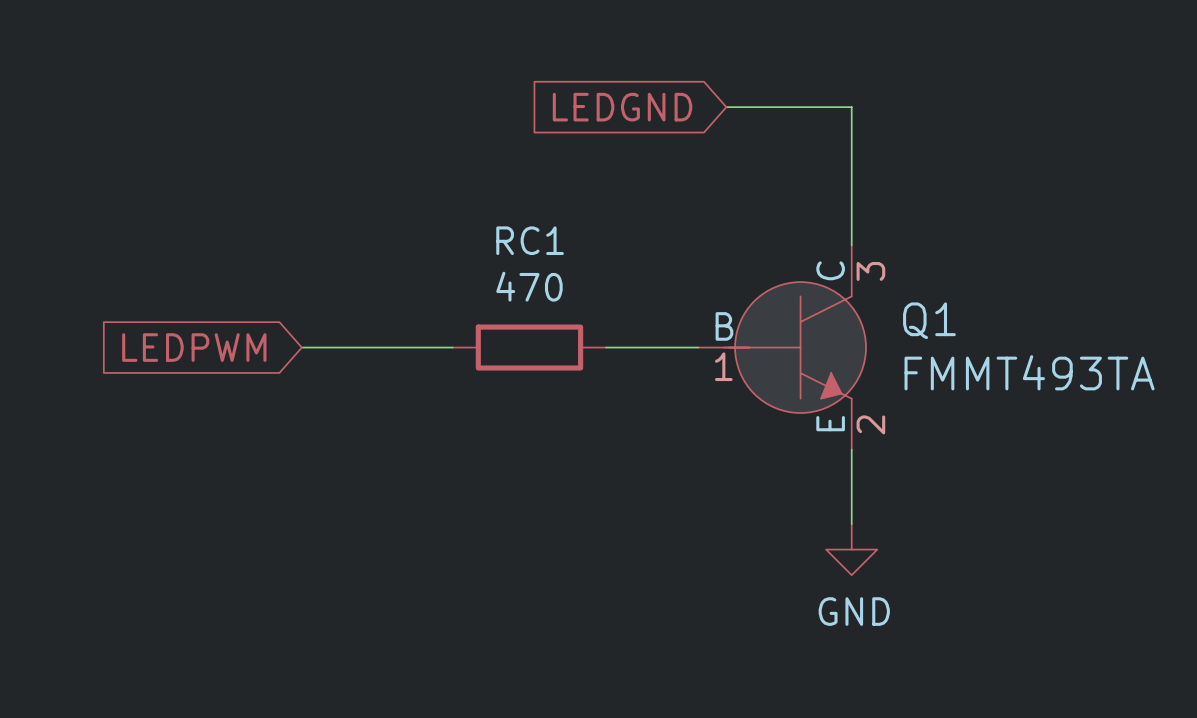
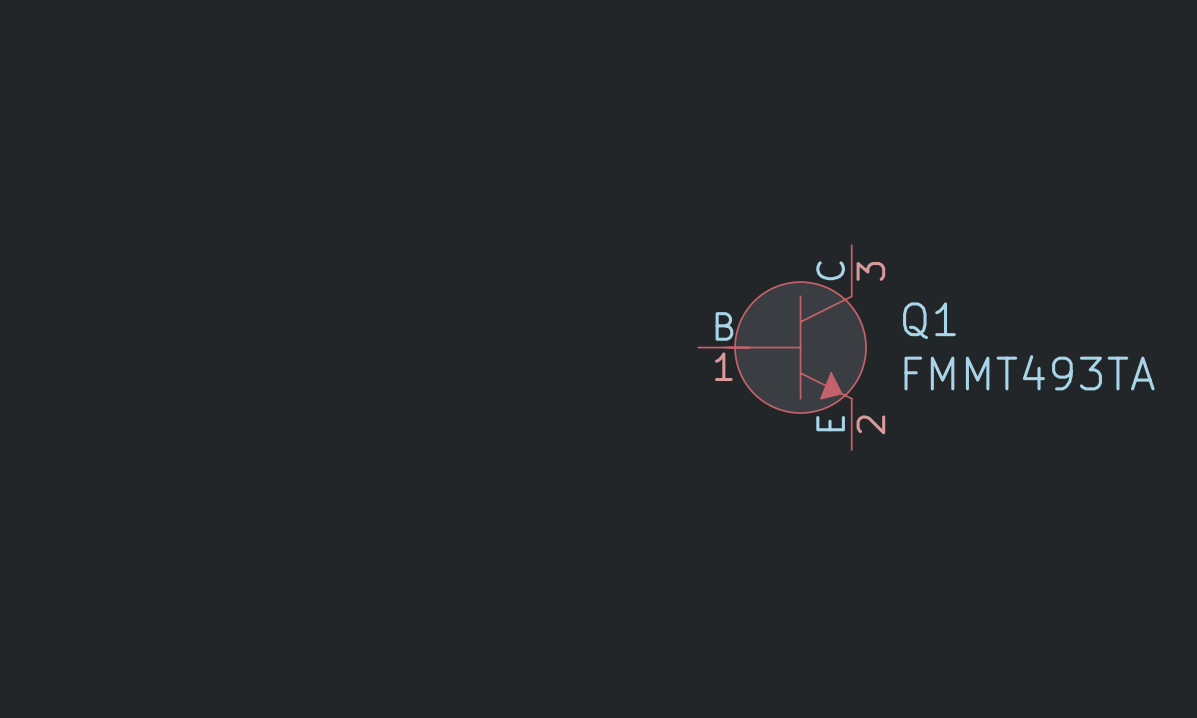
global label: LEDGND (622, 107) -> none
wire: (726, 107) (851, 107) (851, 245) -> none
global label: LEDPWM (194, 347) -> none
wire: (301, 347) (452, 347) -> none
RC1: 470 (529, 347) -> none
wire: (606, 347) (698, 347) -> none
wire: (851, 449) (851, 524) -> none
power symbol: GND (851, 549) -> none

